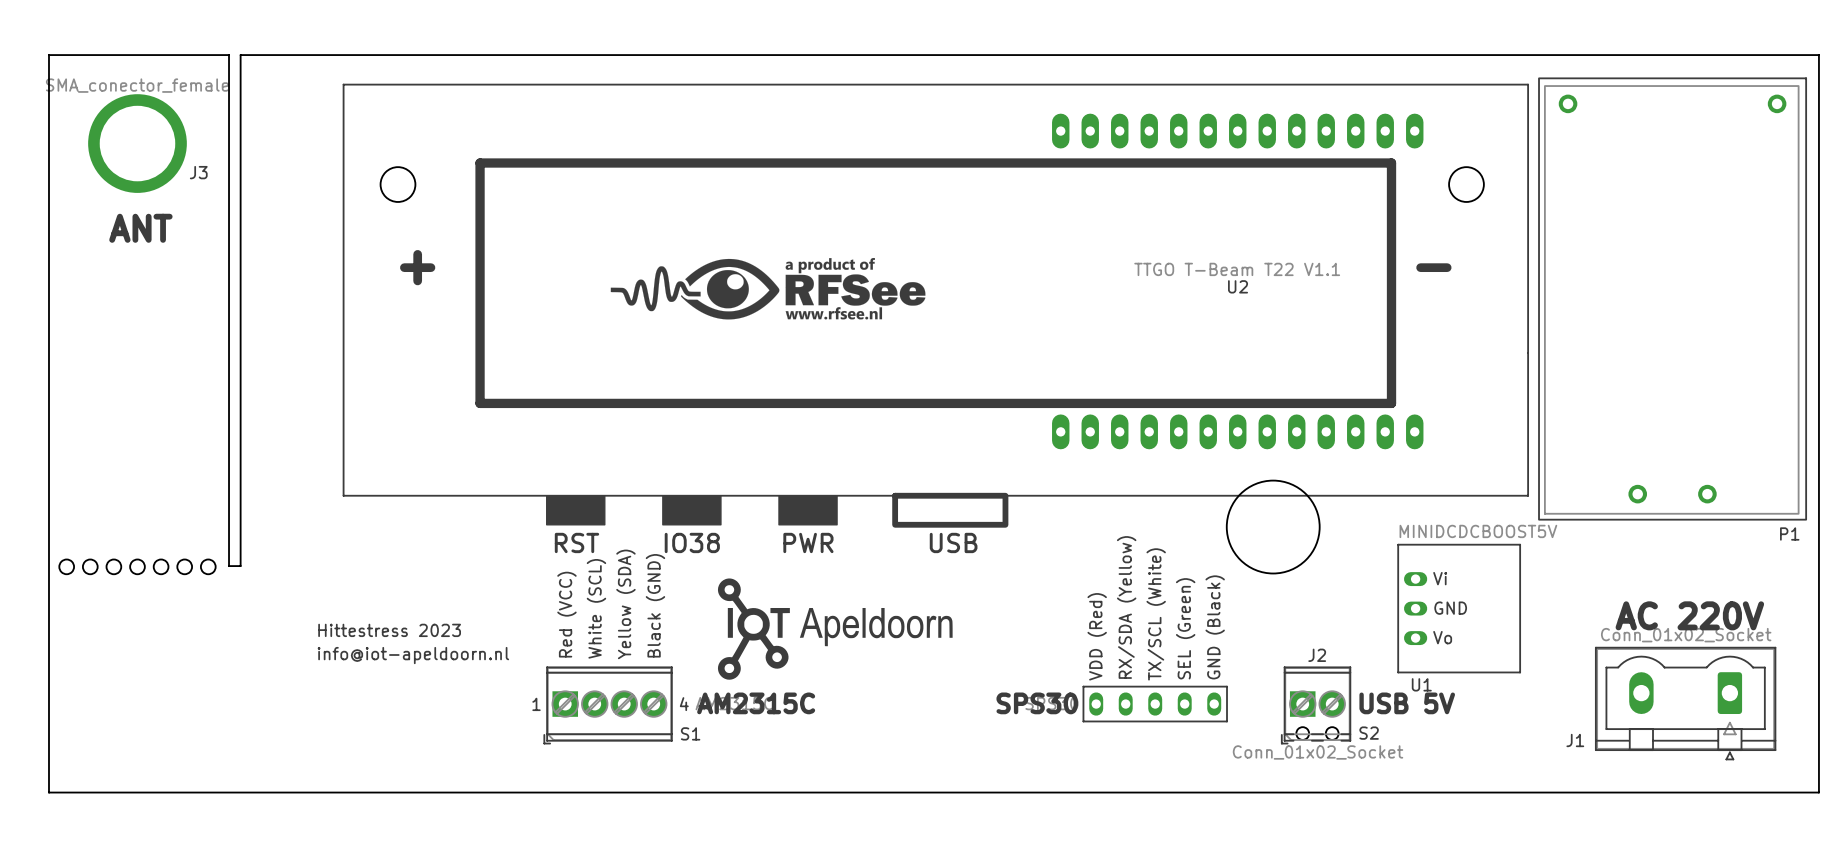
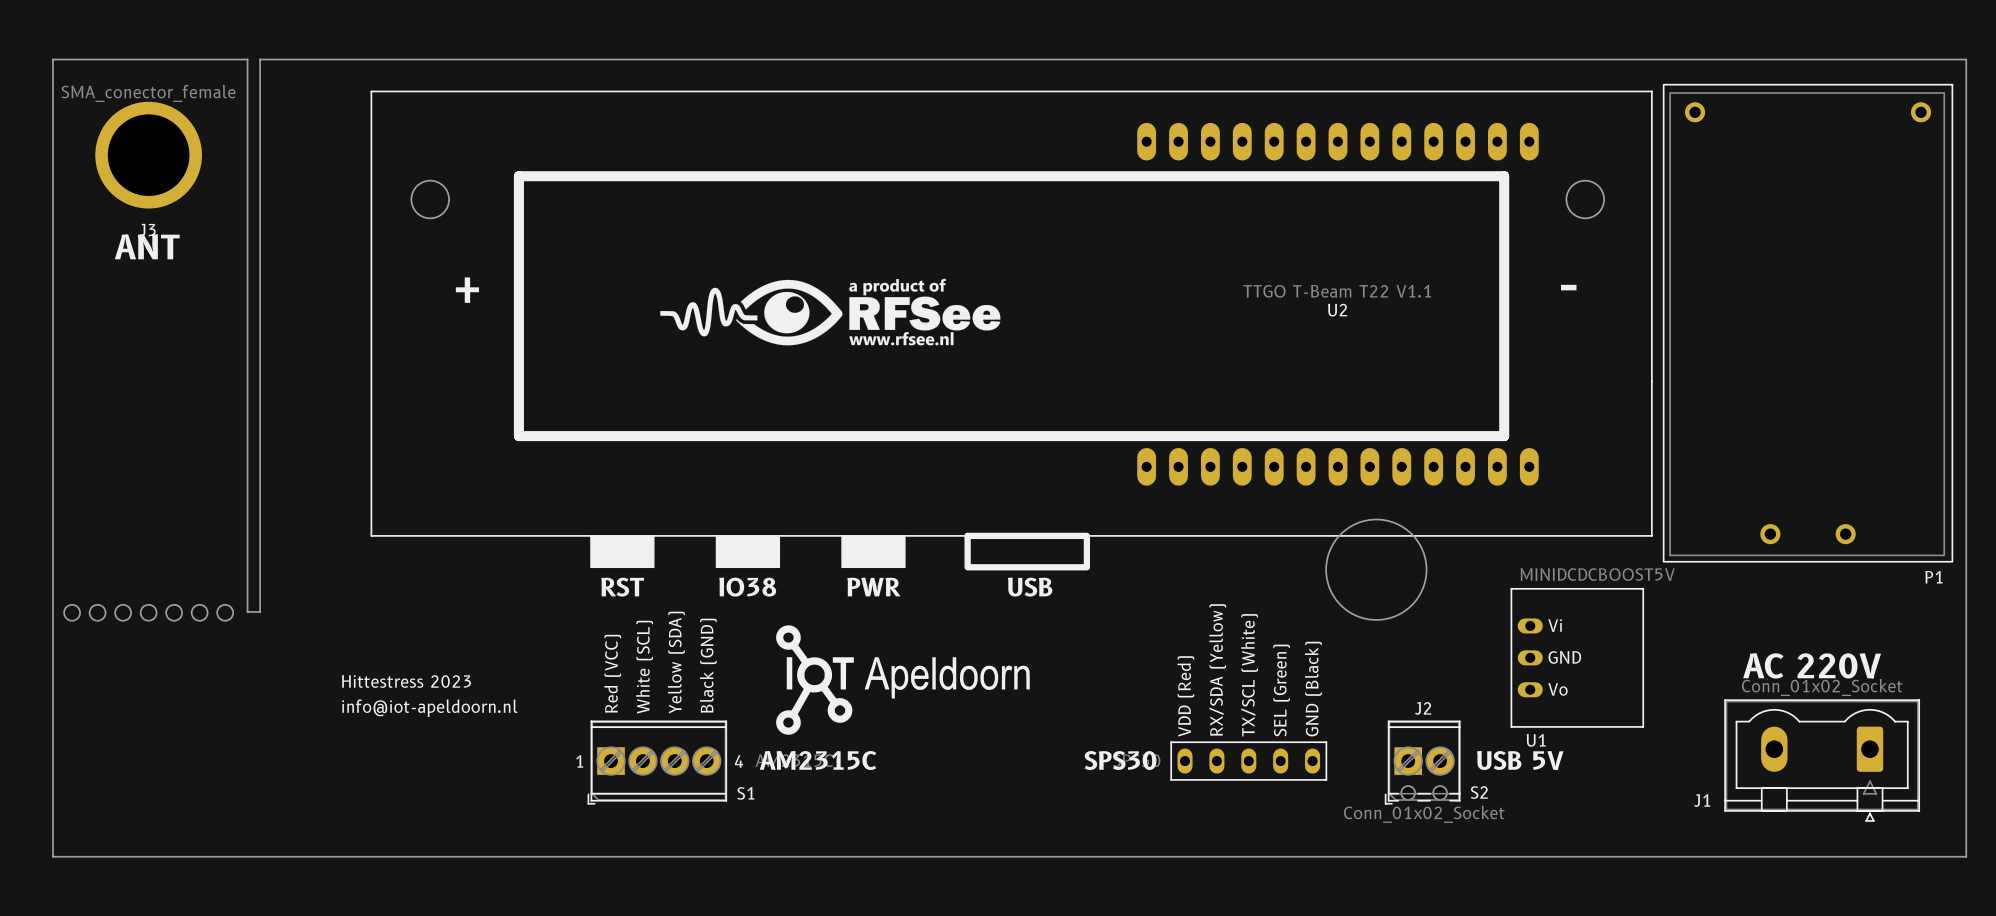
J3 name position: J3 (198, 172) -> J3 (147, 230)

